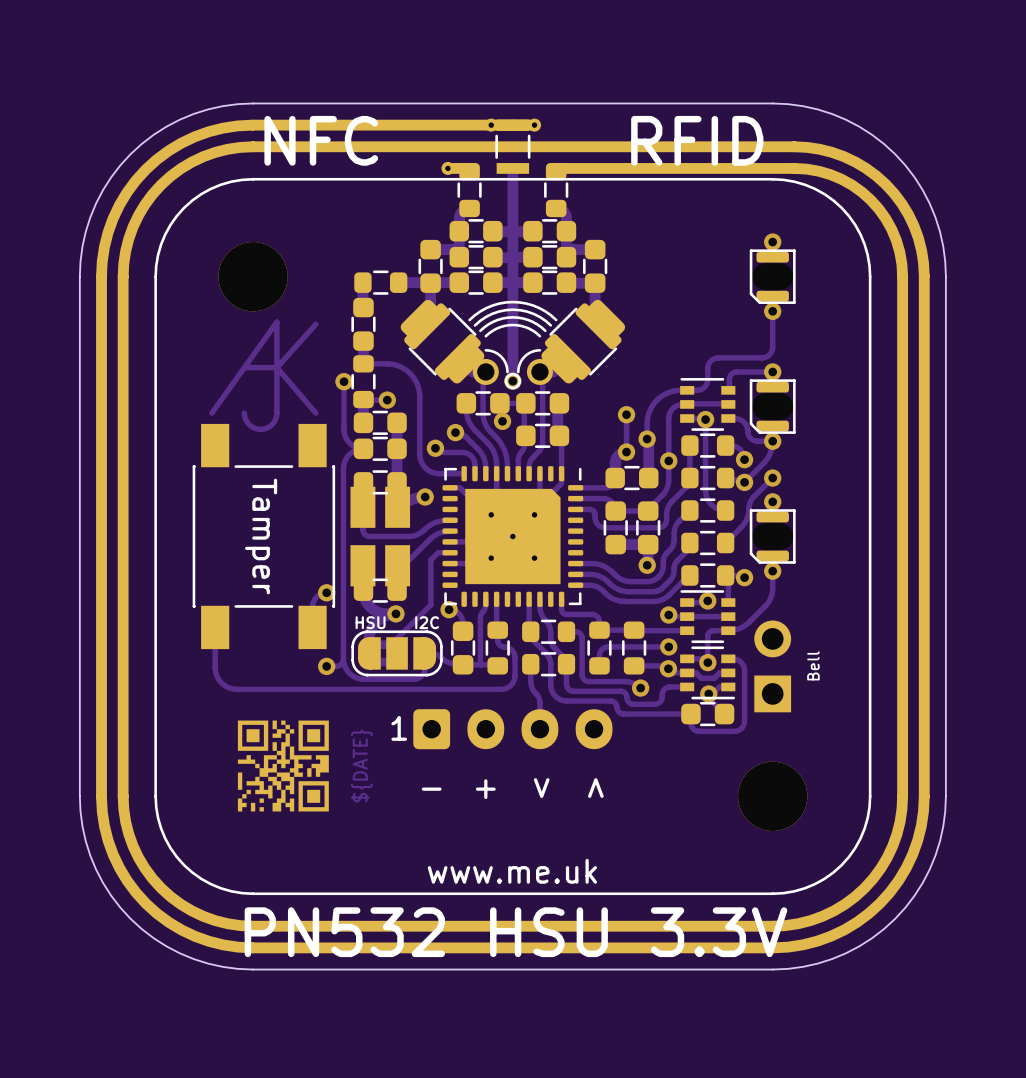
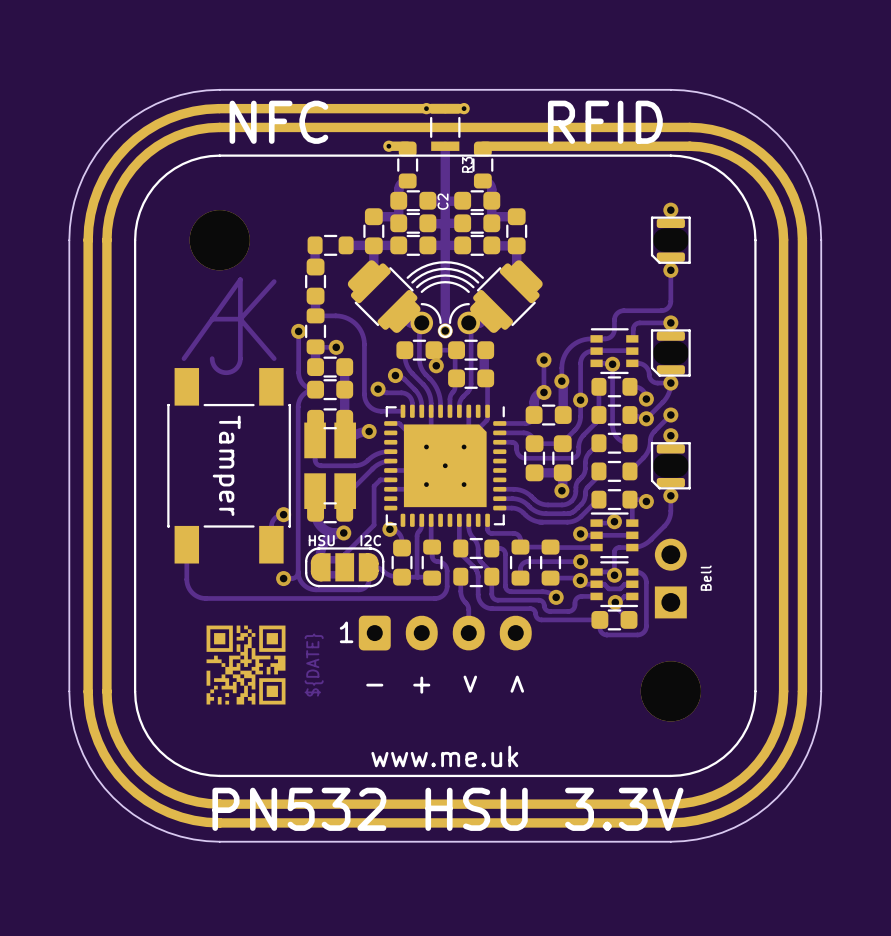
R3: none -> (467, 164)
C2 name: none -> C2 (443, 201)

